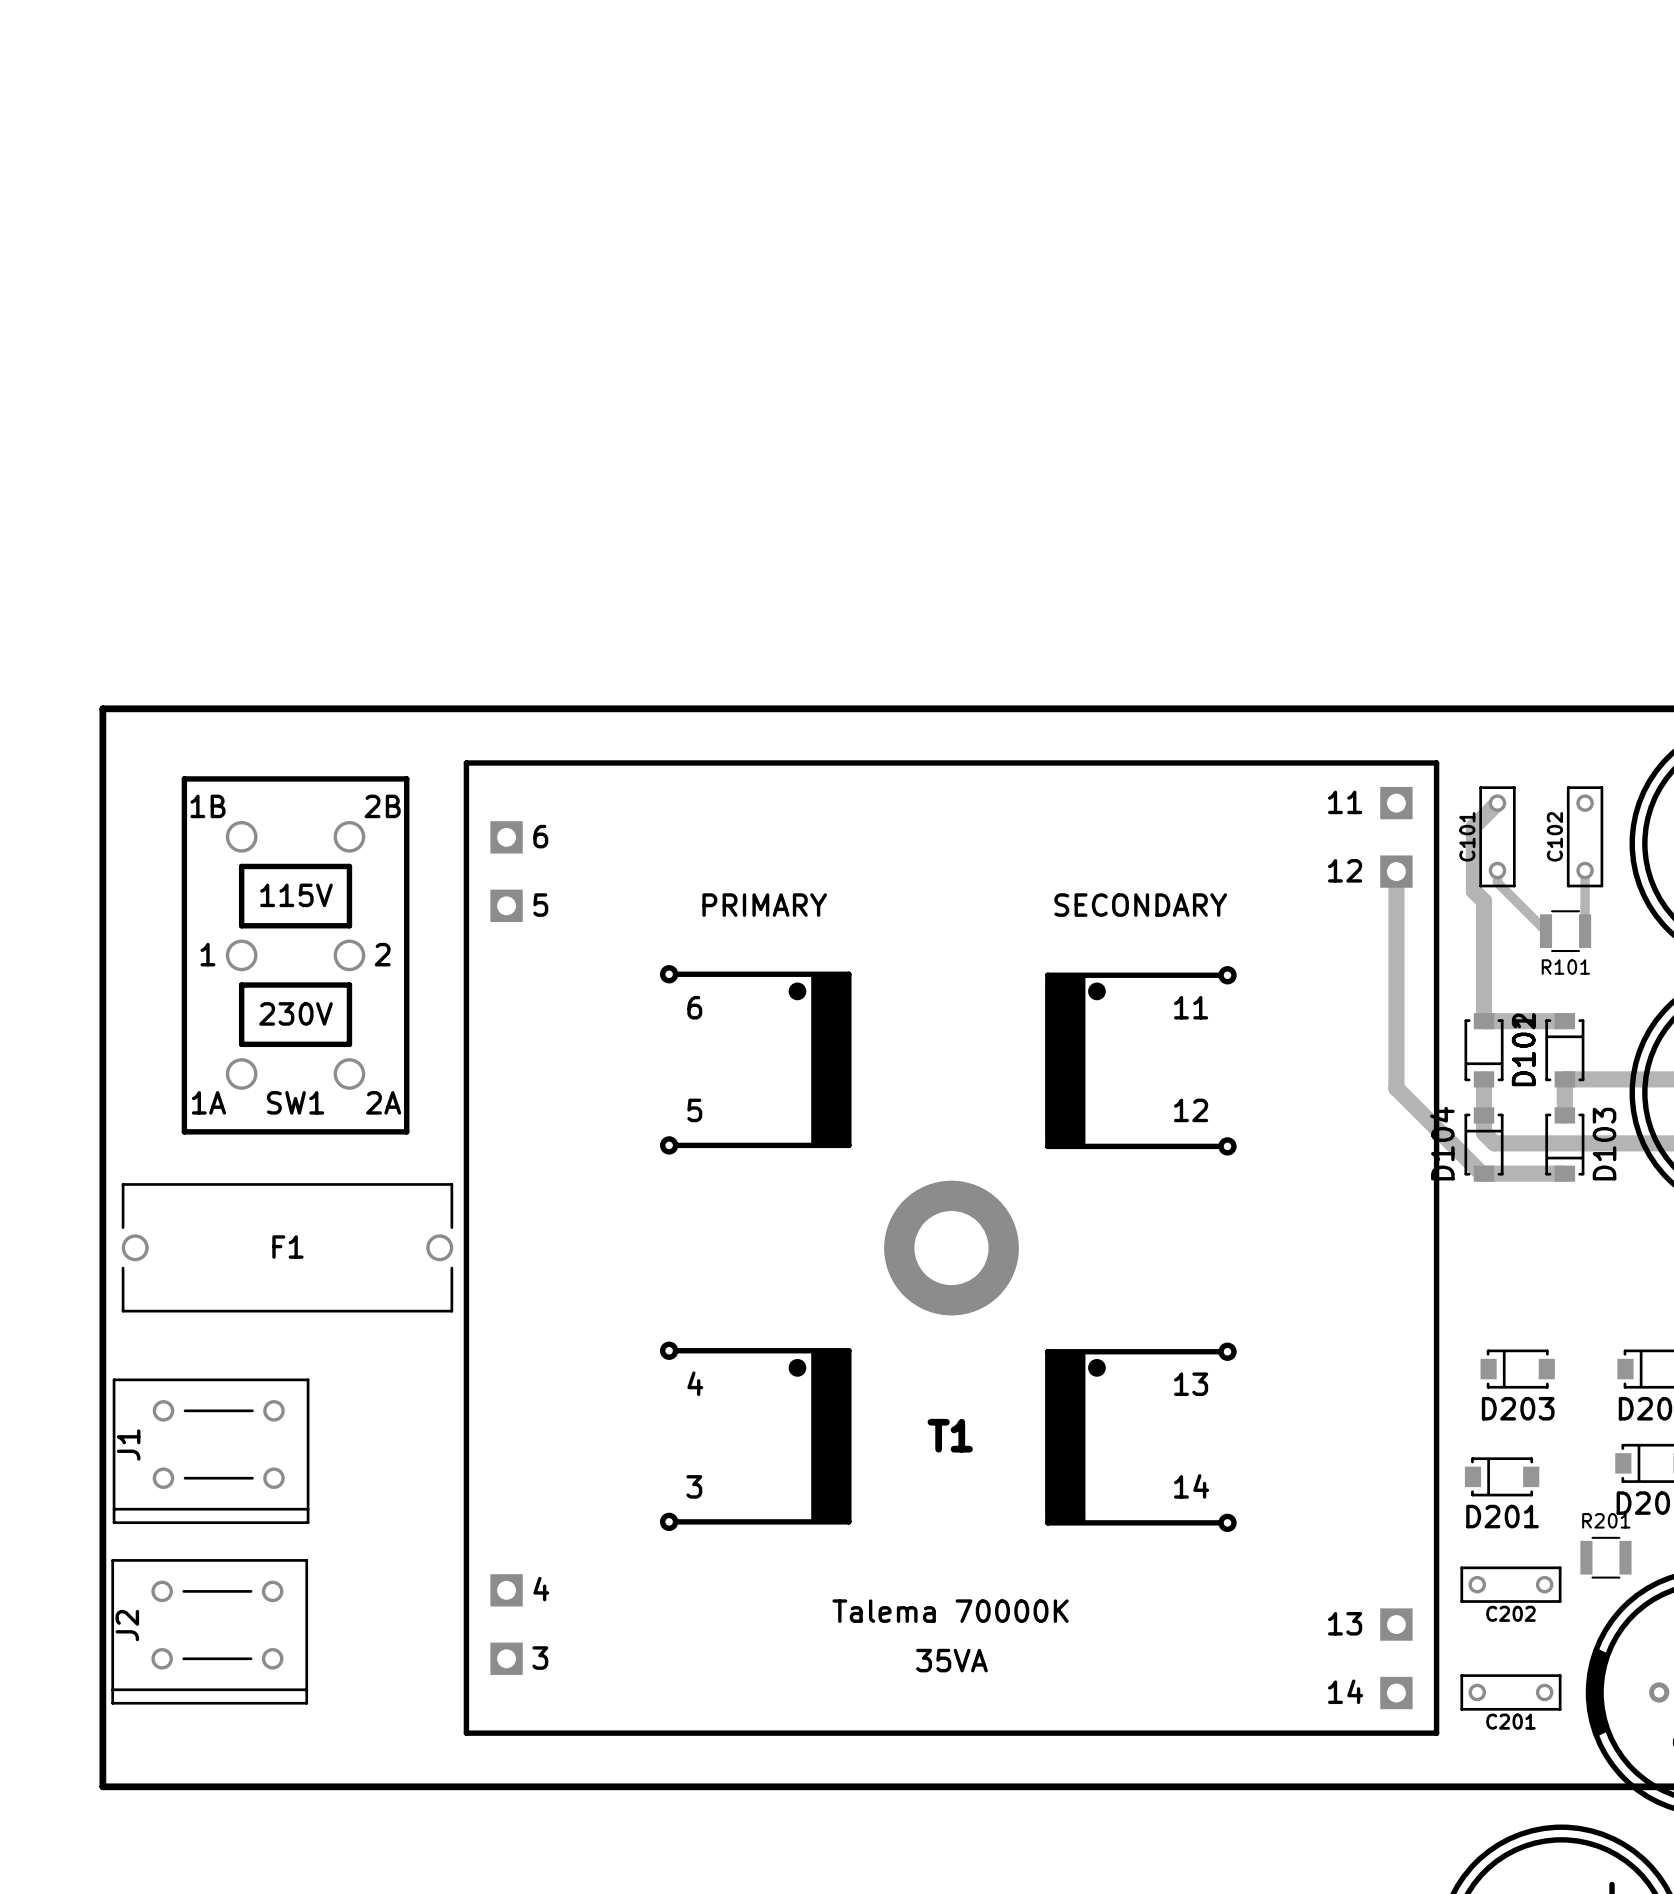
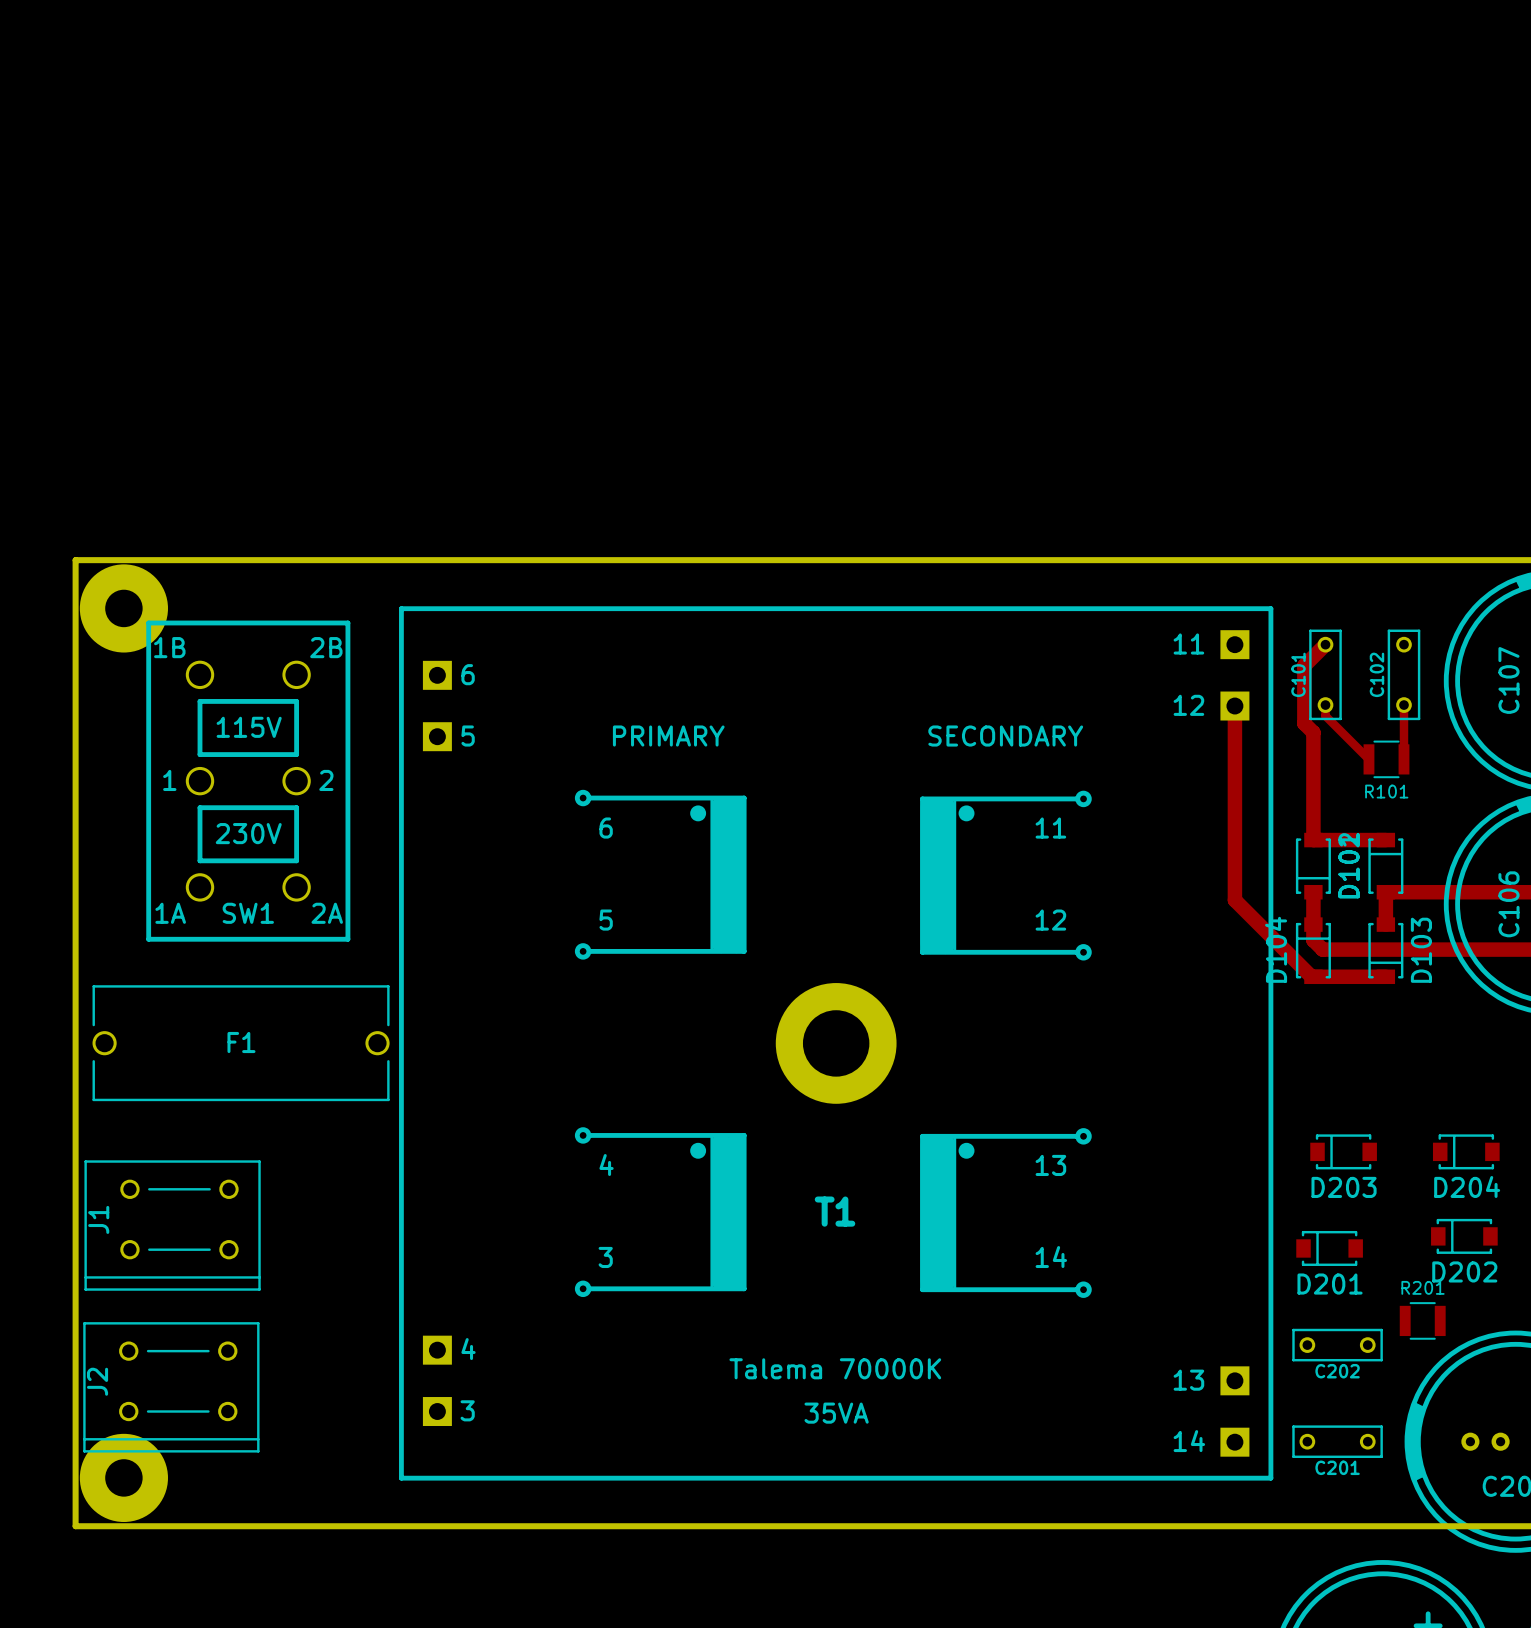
part: none -> (123, 608)
part: none -> (123, 1477)

